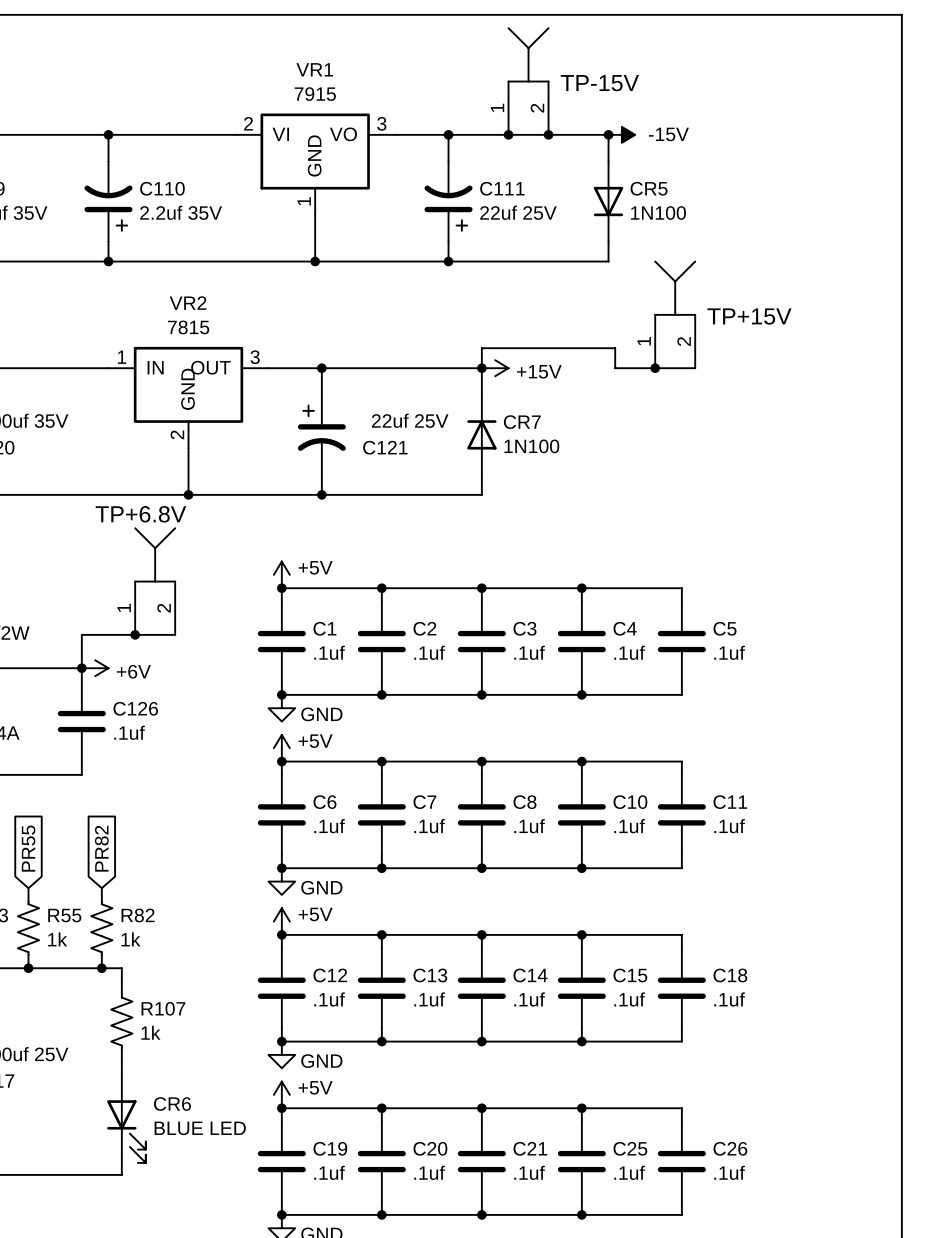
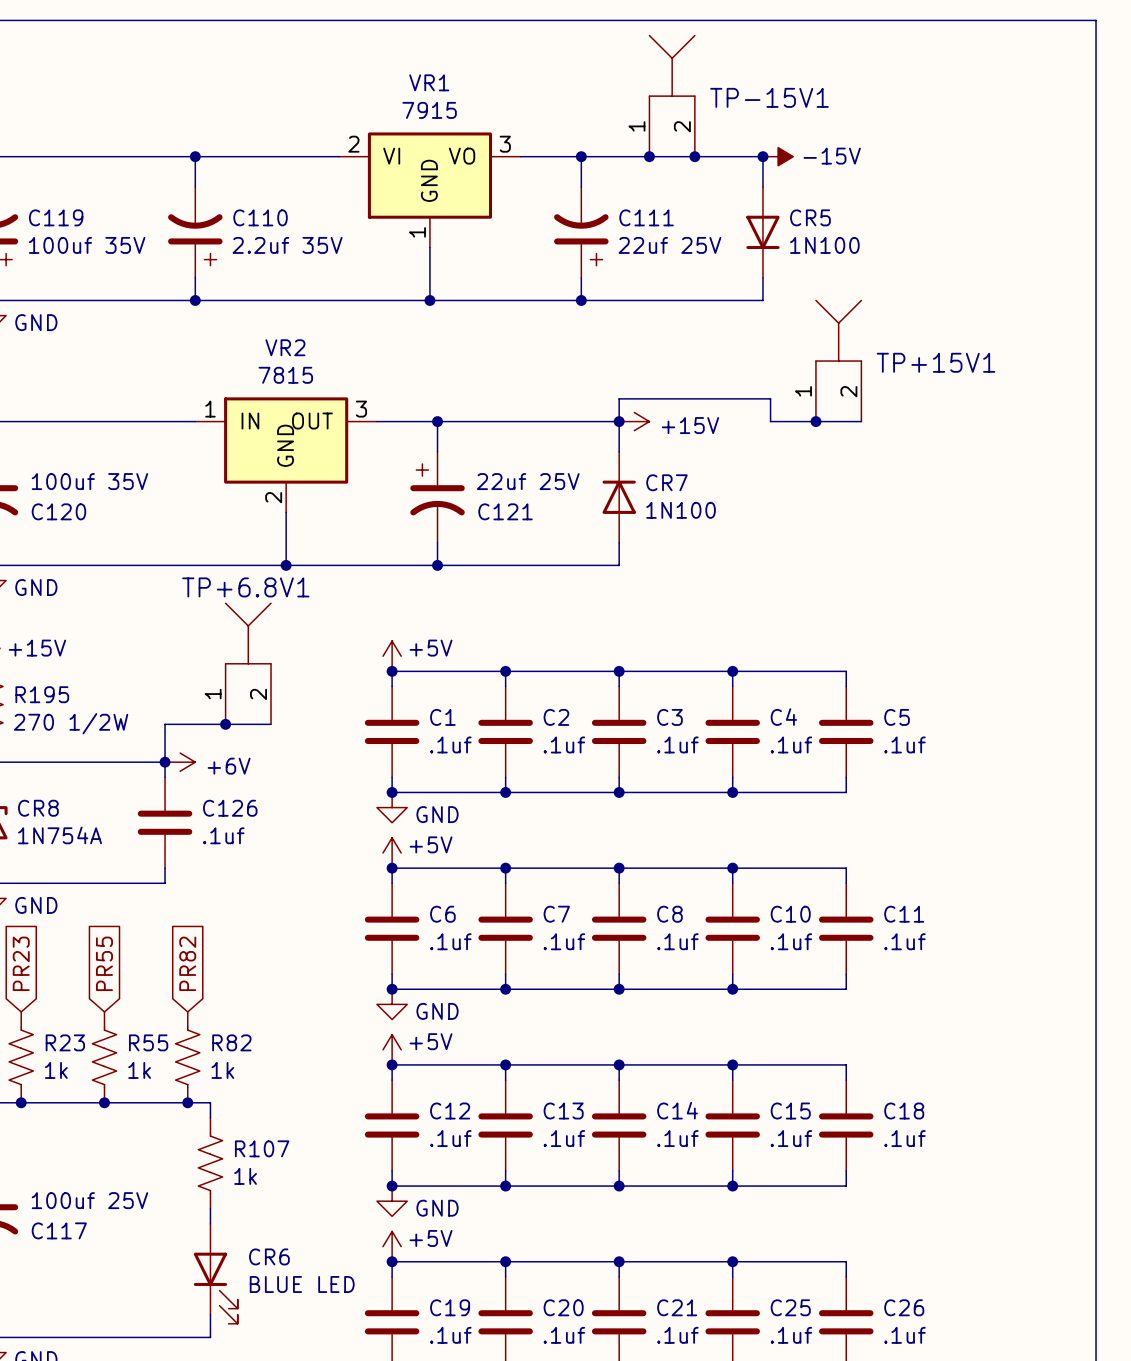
TP-15V name: TP-15V (599, 83) -> TP-15V1 (769, 97)
TP+15V name: TP+15V (749, 316) -> TP+15V1 (936, 362)
TP+6.8V name: TP+6.8V (140, 514) -> TP+6.8V1 (245, 587)

